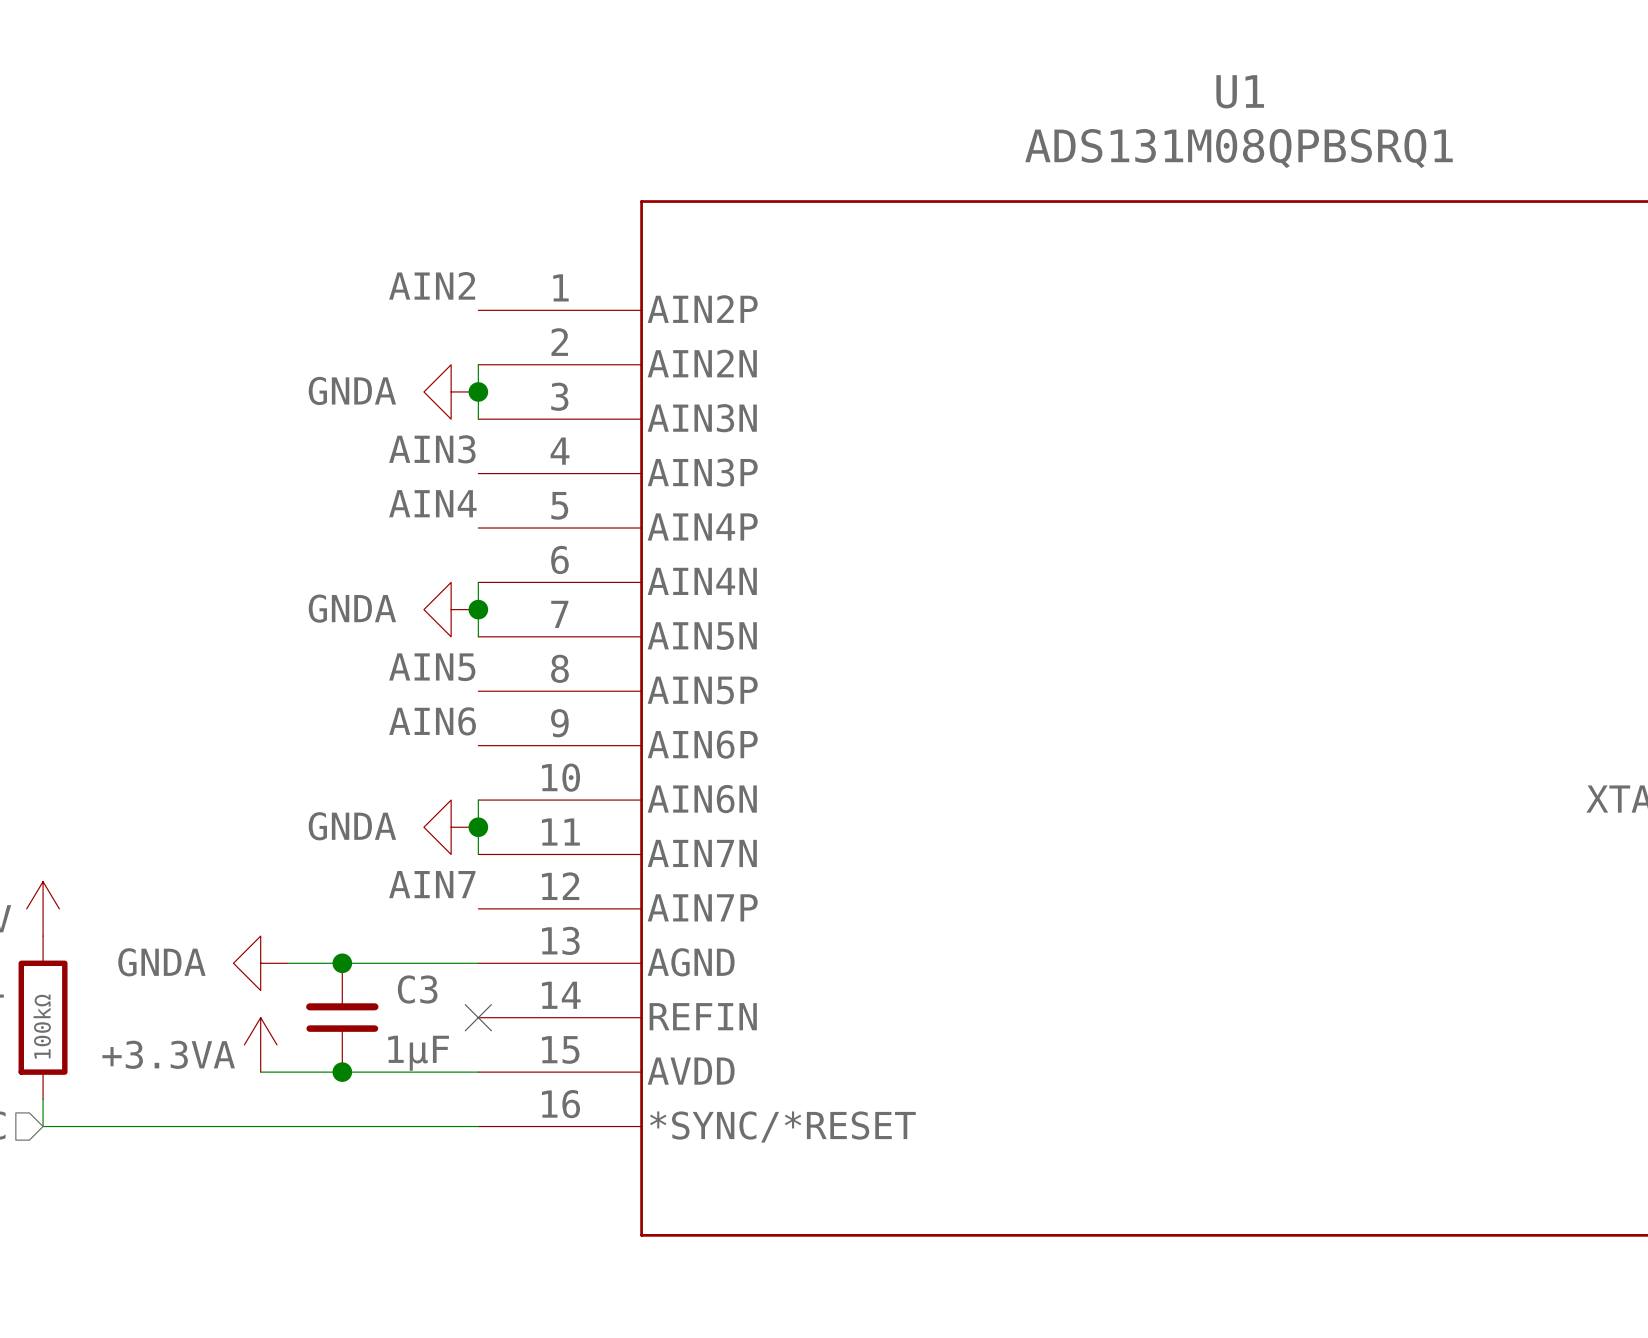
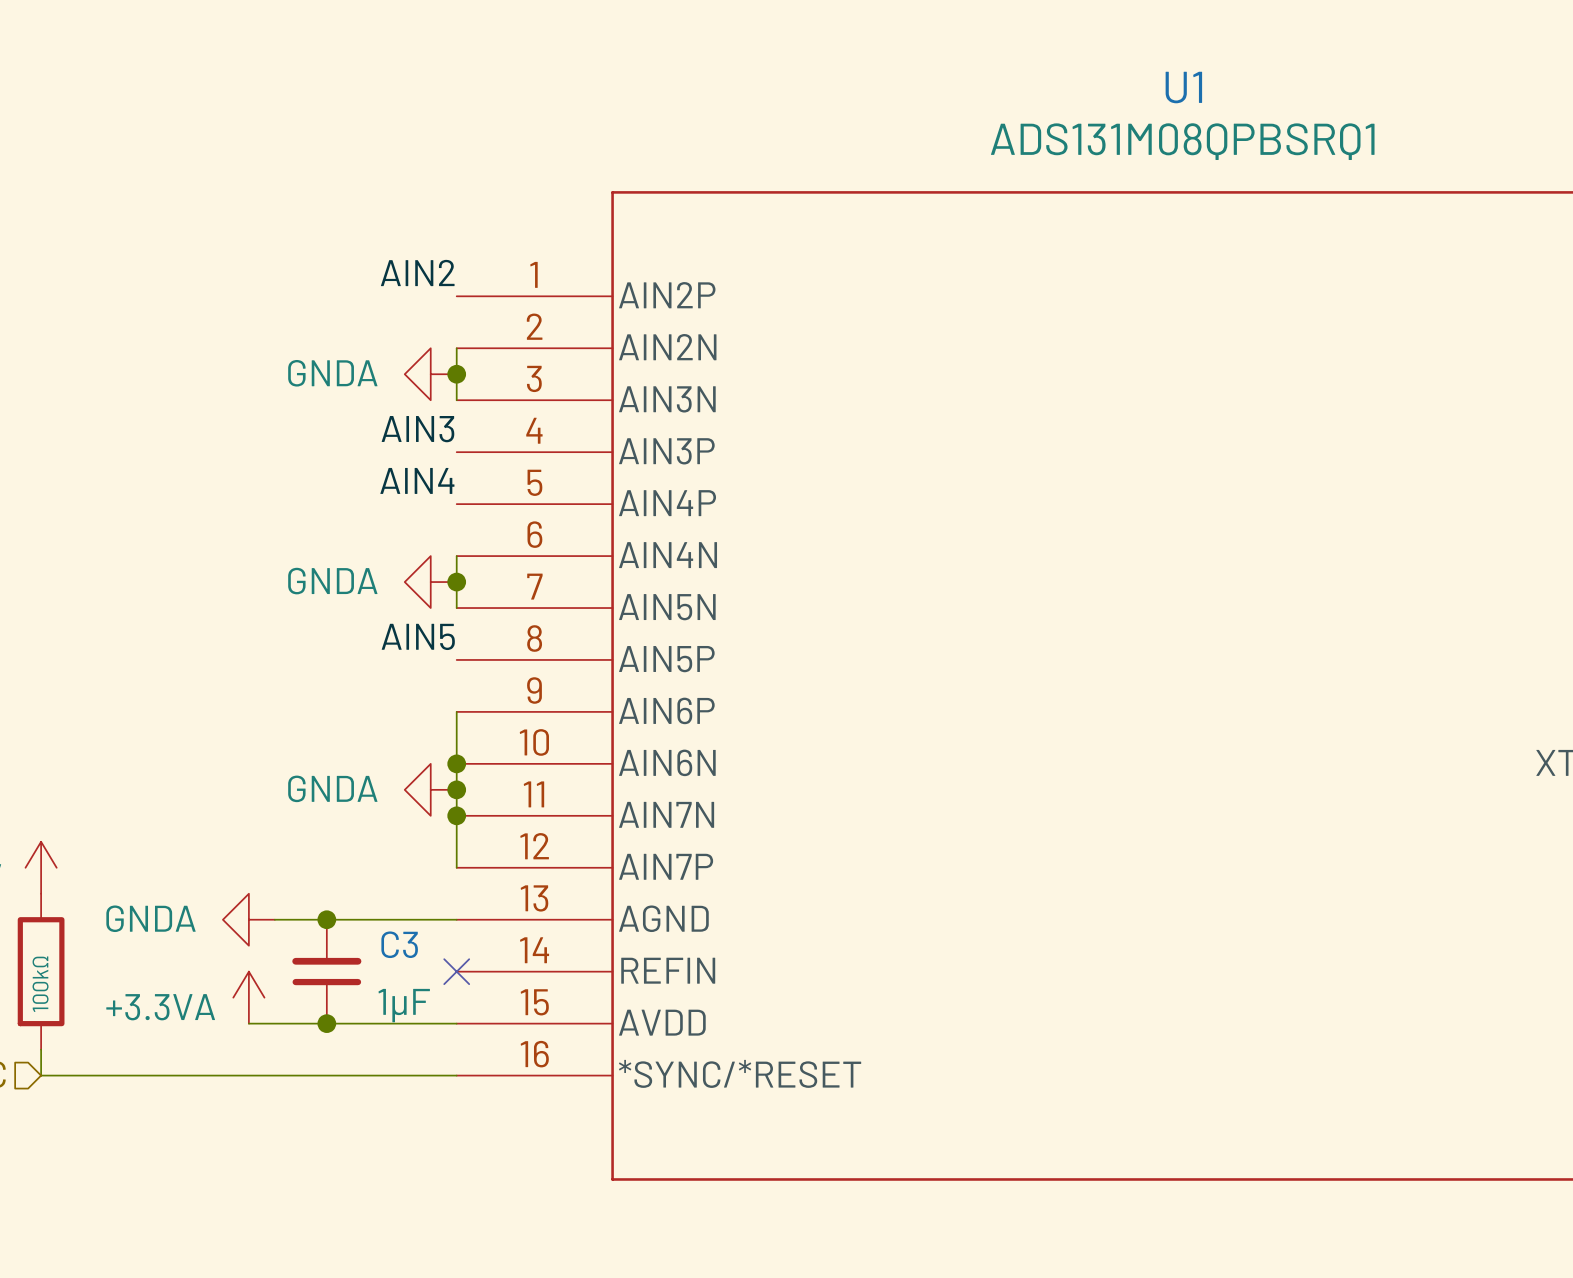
label: AIN6 (432, 721) -> none
wire: none -> (456, 711) (456, 763)
junction: none -> (456, 763)
wire: none -> (456, 815) (456, 867)
junction: none -> (456, 815)
label: AIN7 (432, 884) -> none

